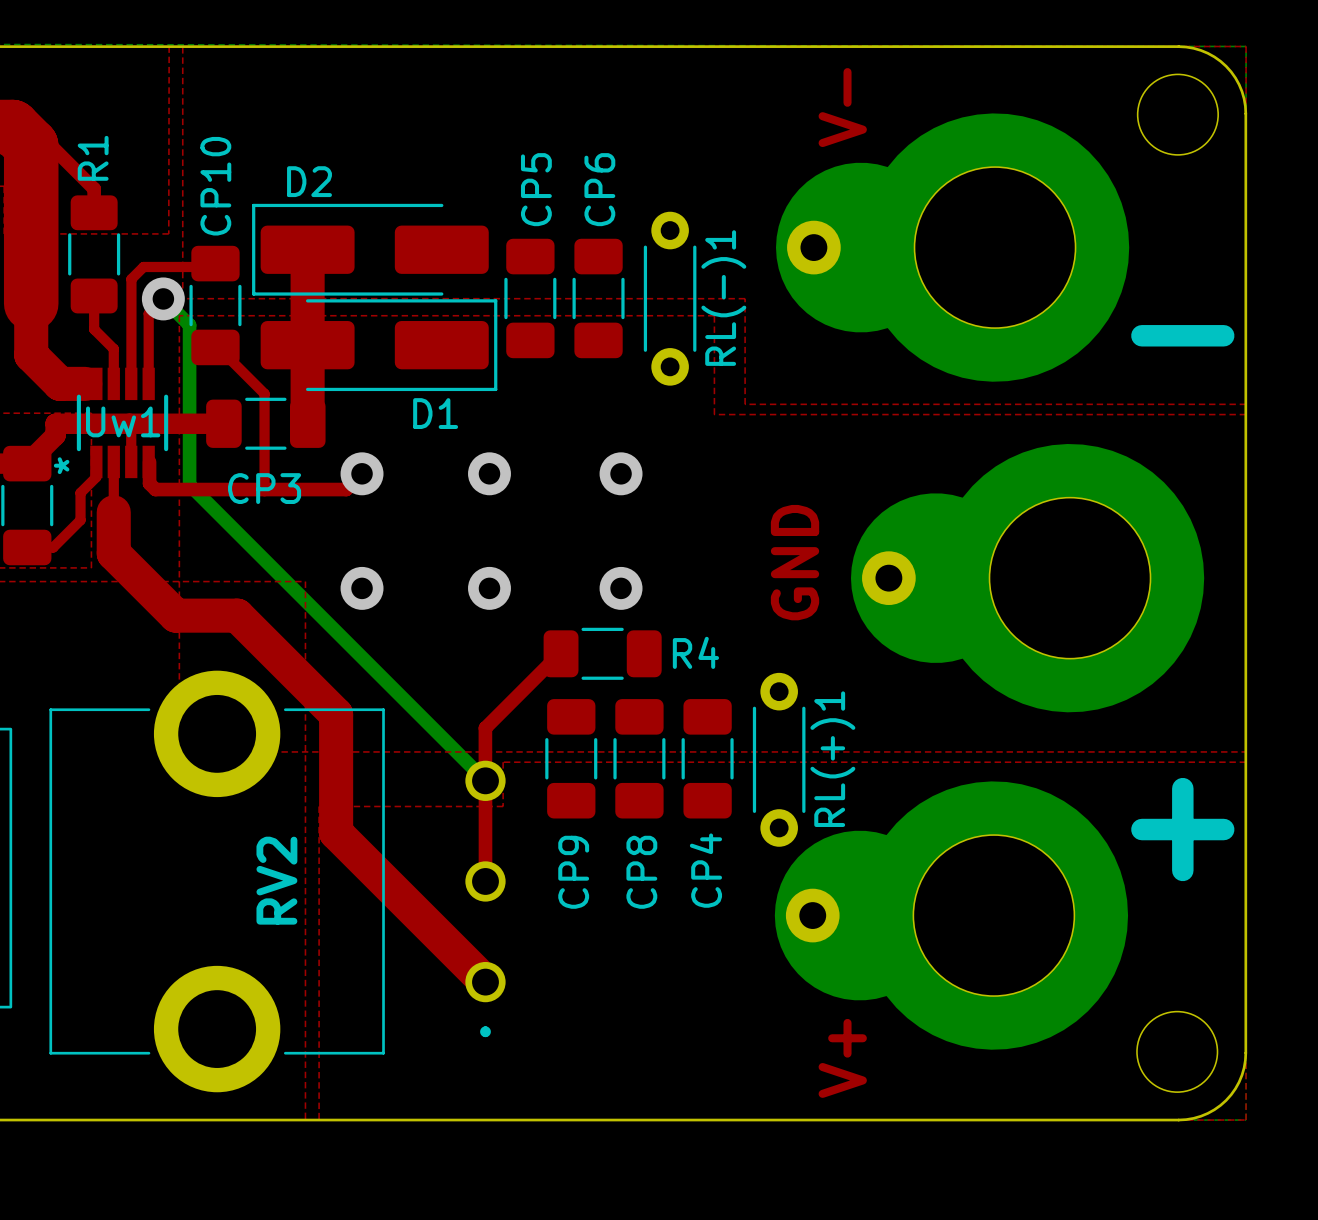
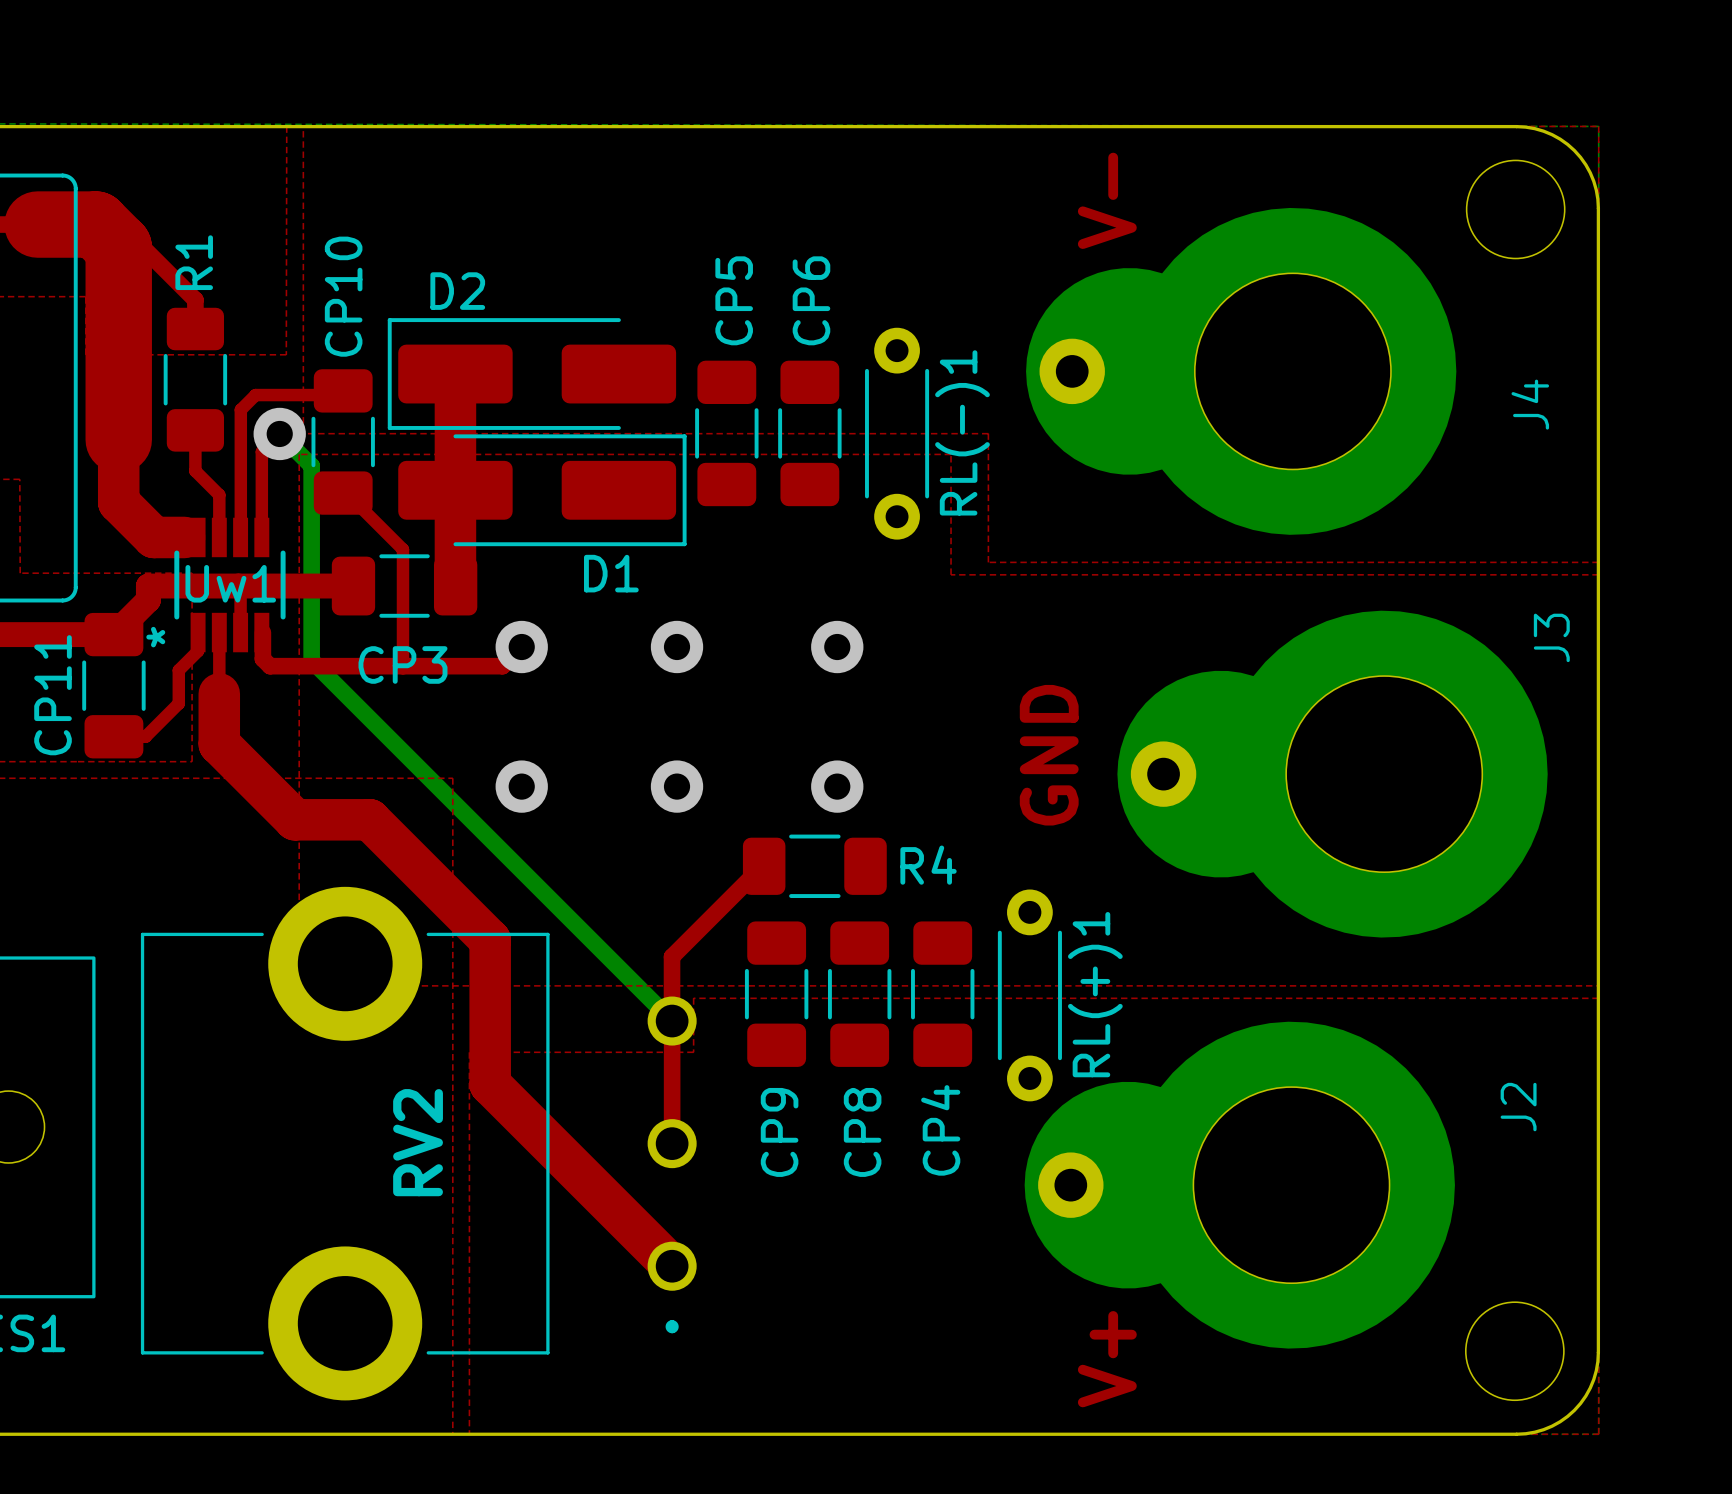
J4 name: none -> J4 (1530, 404)
text: - (1182, 335) -> none
J3 name: none -> J3 (1551, 637)
text: + (1182, 829) -> none
J2 name: none -> J2 (1518, 1107)

